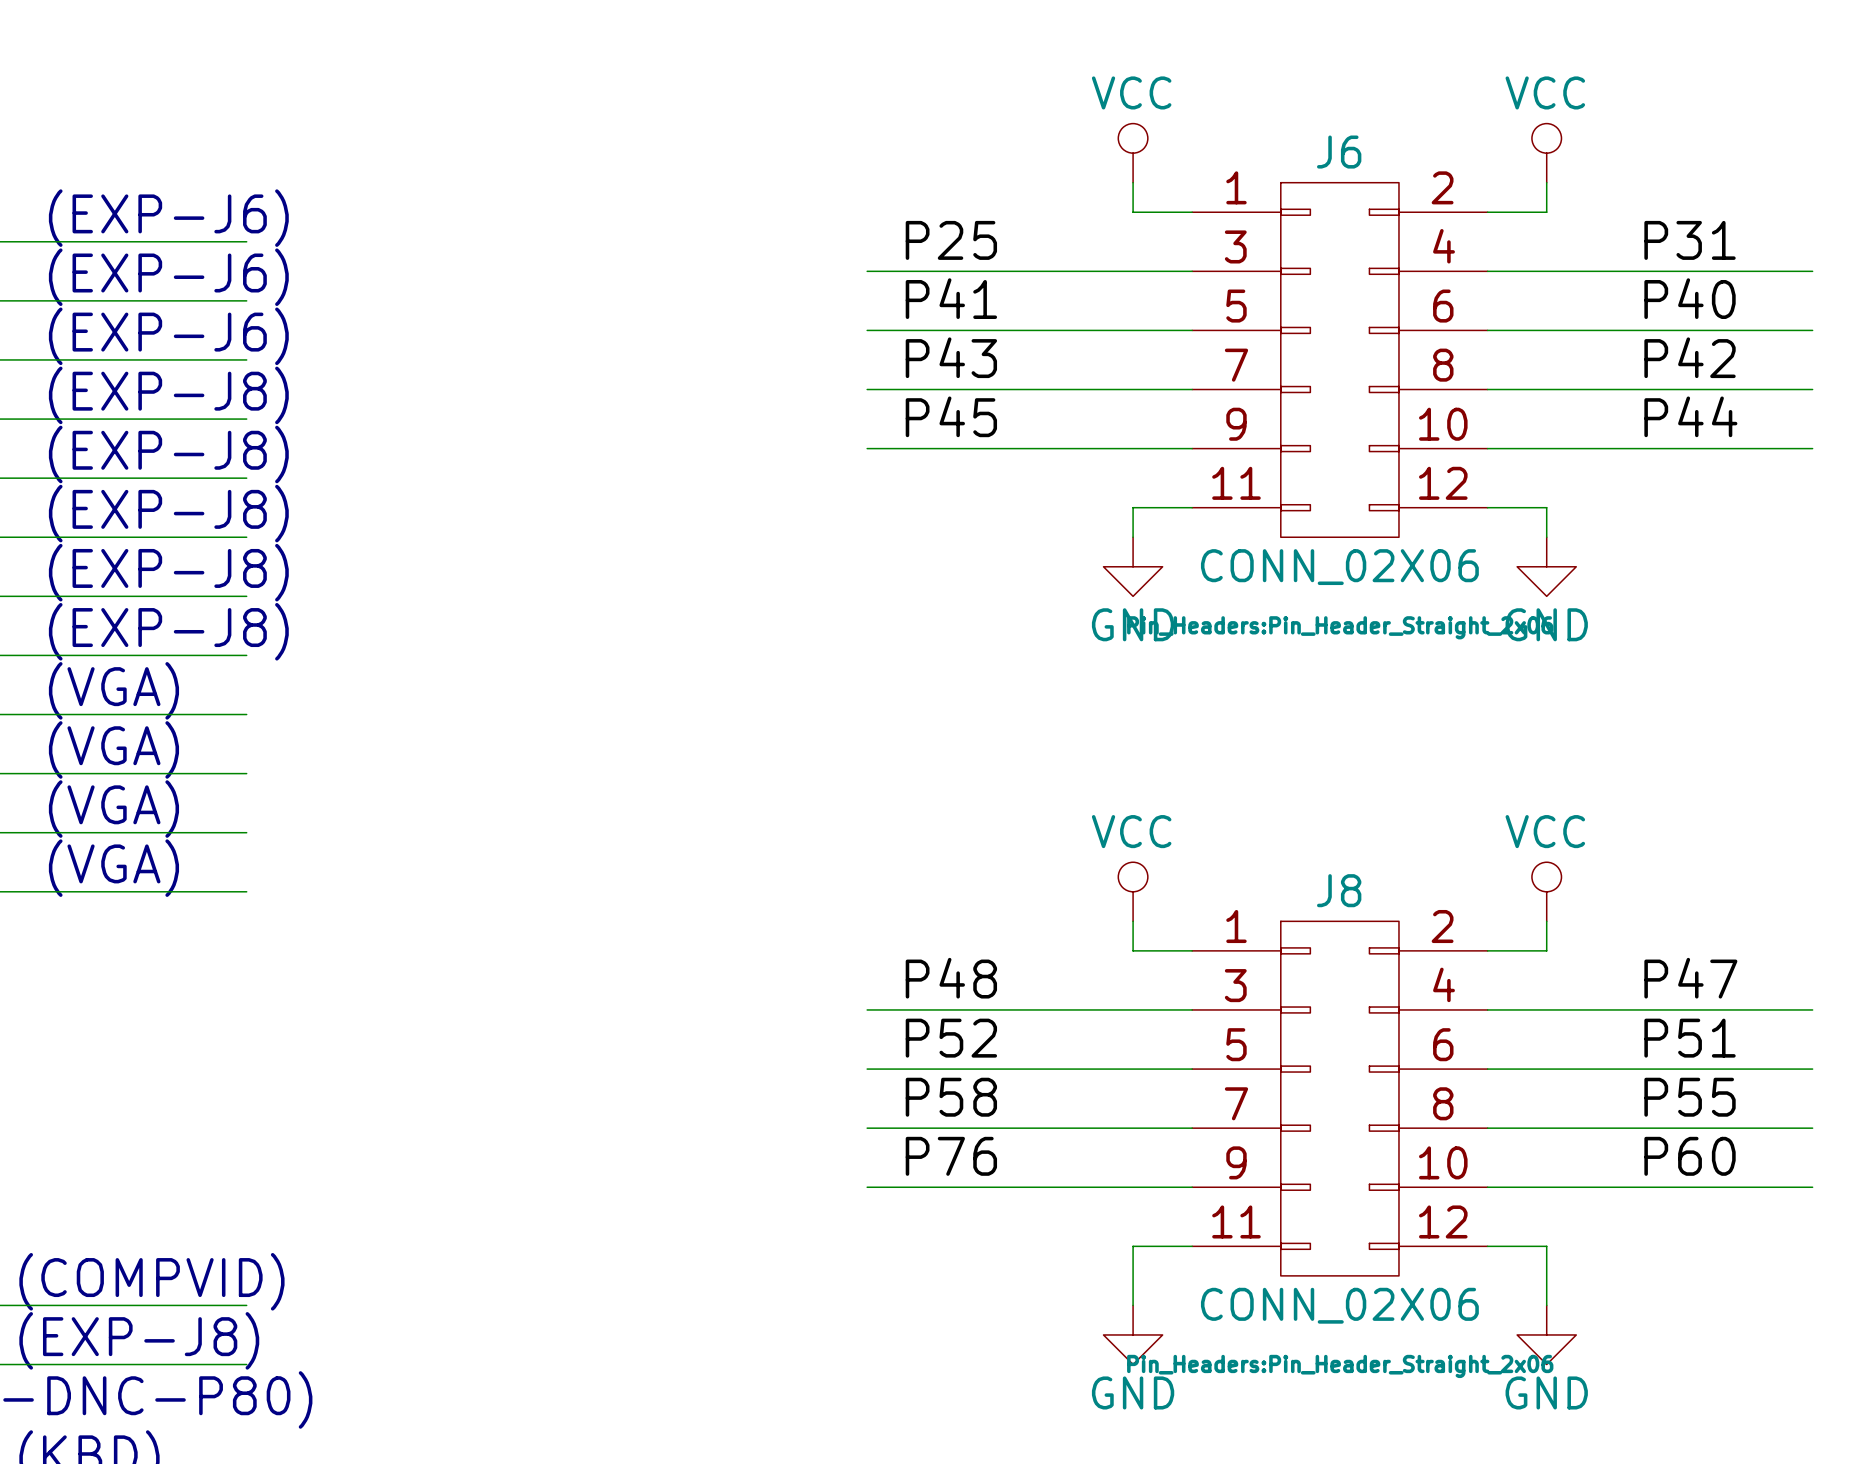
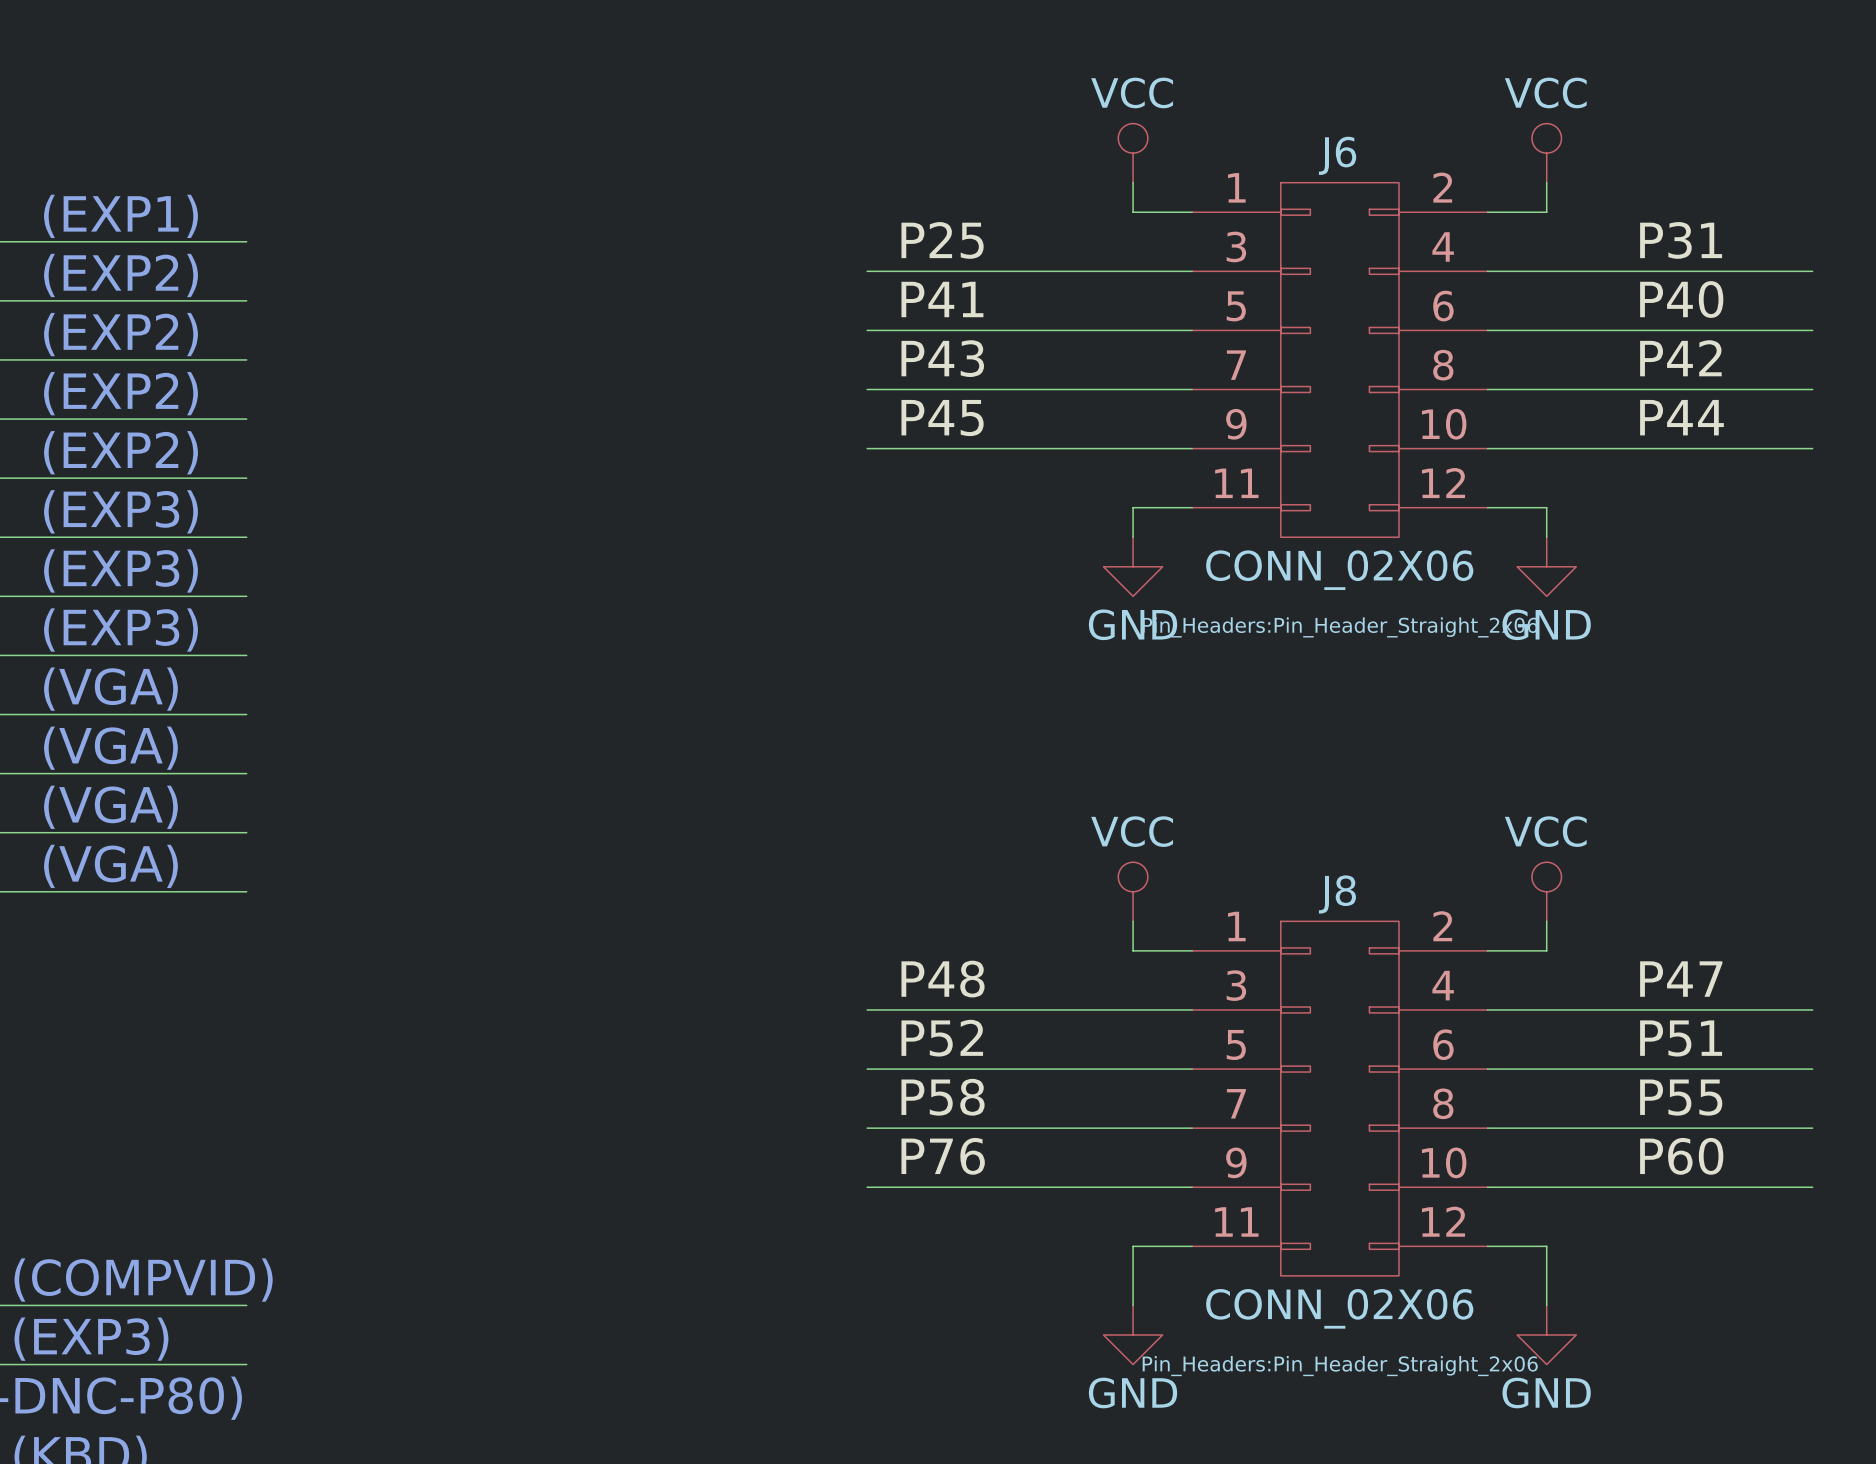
text: (EXP-J6) (168, 218) -> (EXP1) (121, 216)
text: (EXP-J6) (168, 277) -> (EXP2) (121, 275)
text: (EXP-J6) (168, 336) -> (EXP2) (121, 334)
text: (EXP-J8) (168, 395) -> (EXP2) (121, 393)
text: (EXP-J8) (168, 454) -> (EXP2) (121, 452)
text: (EXP-J8) (168, 513) -> (EXP3) (121, 511)
text: (EXP-J8) (168, 572) -> (EXP3) (121, 570)
text: (EXP-J8) (168, 631) -> (EXP3) (121, 630)
text: (EXP-J8) (139, 1340) -> (EXP3) (91, 1339)

